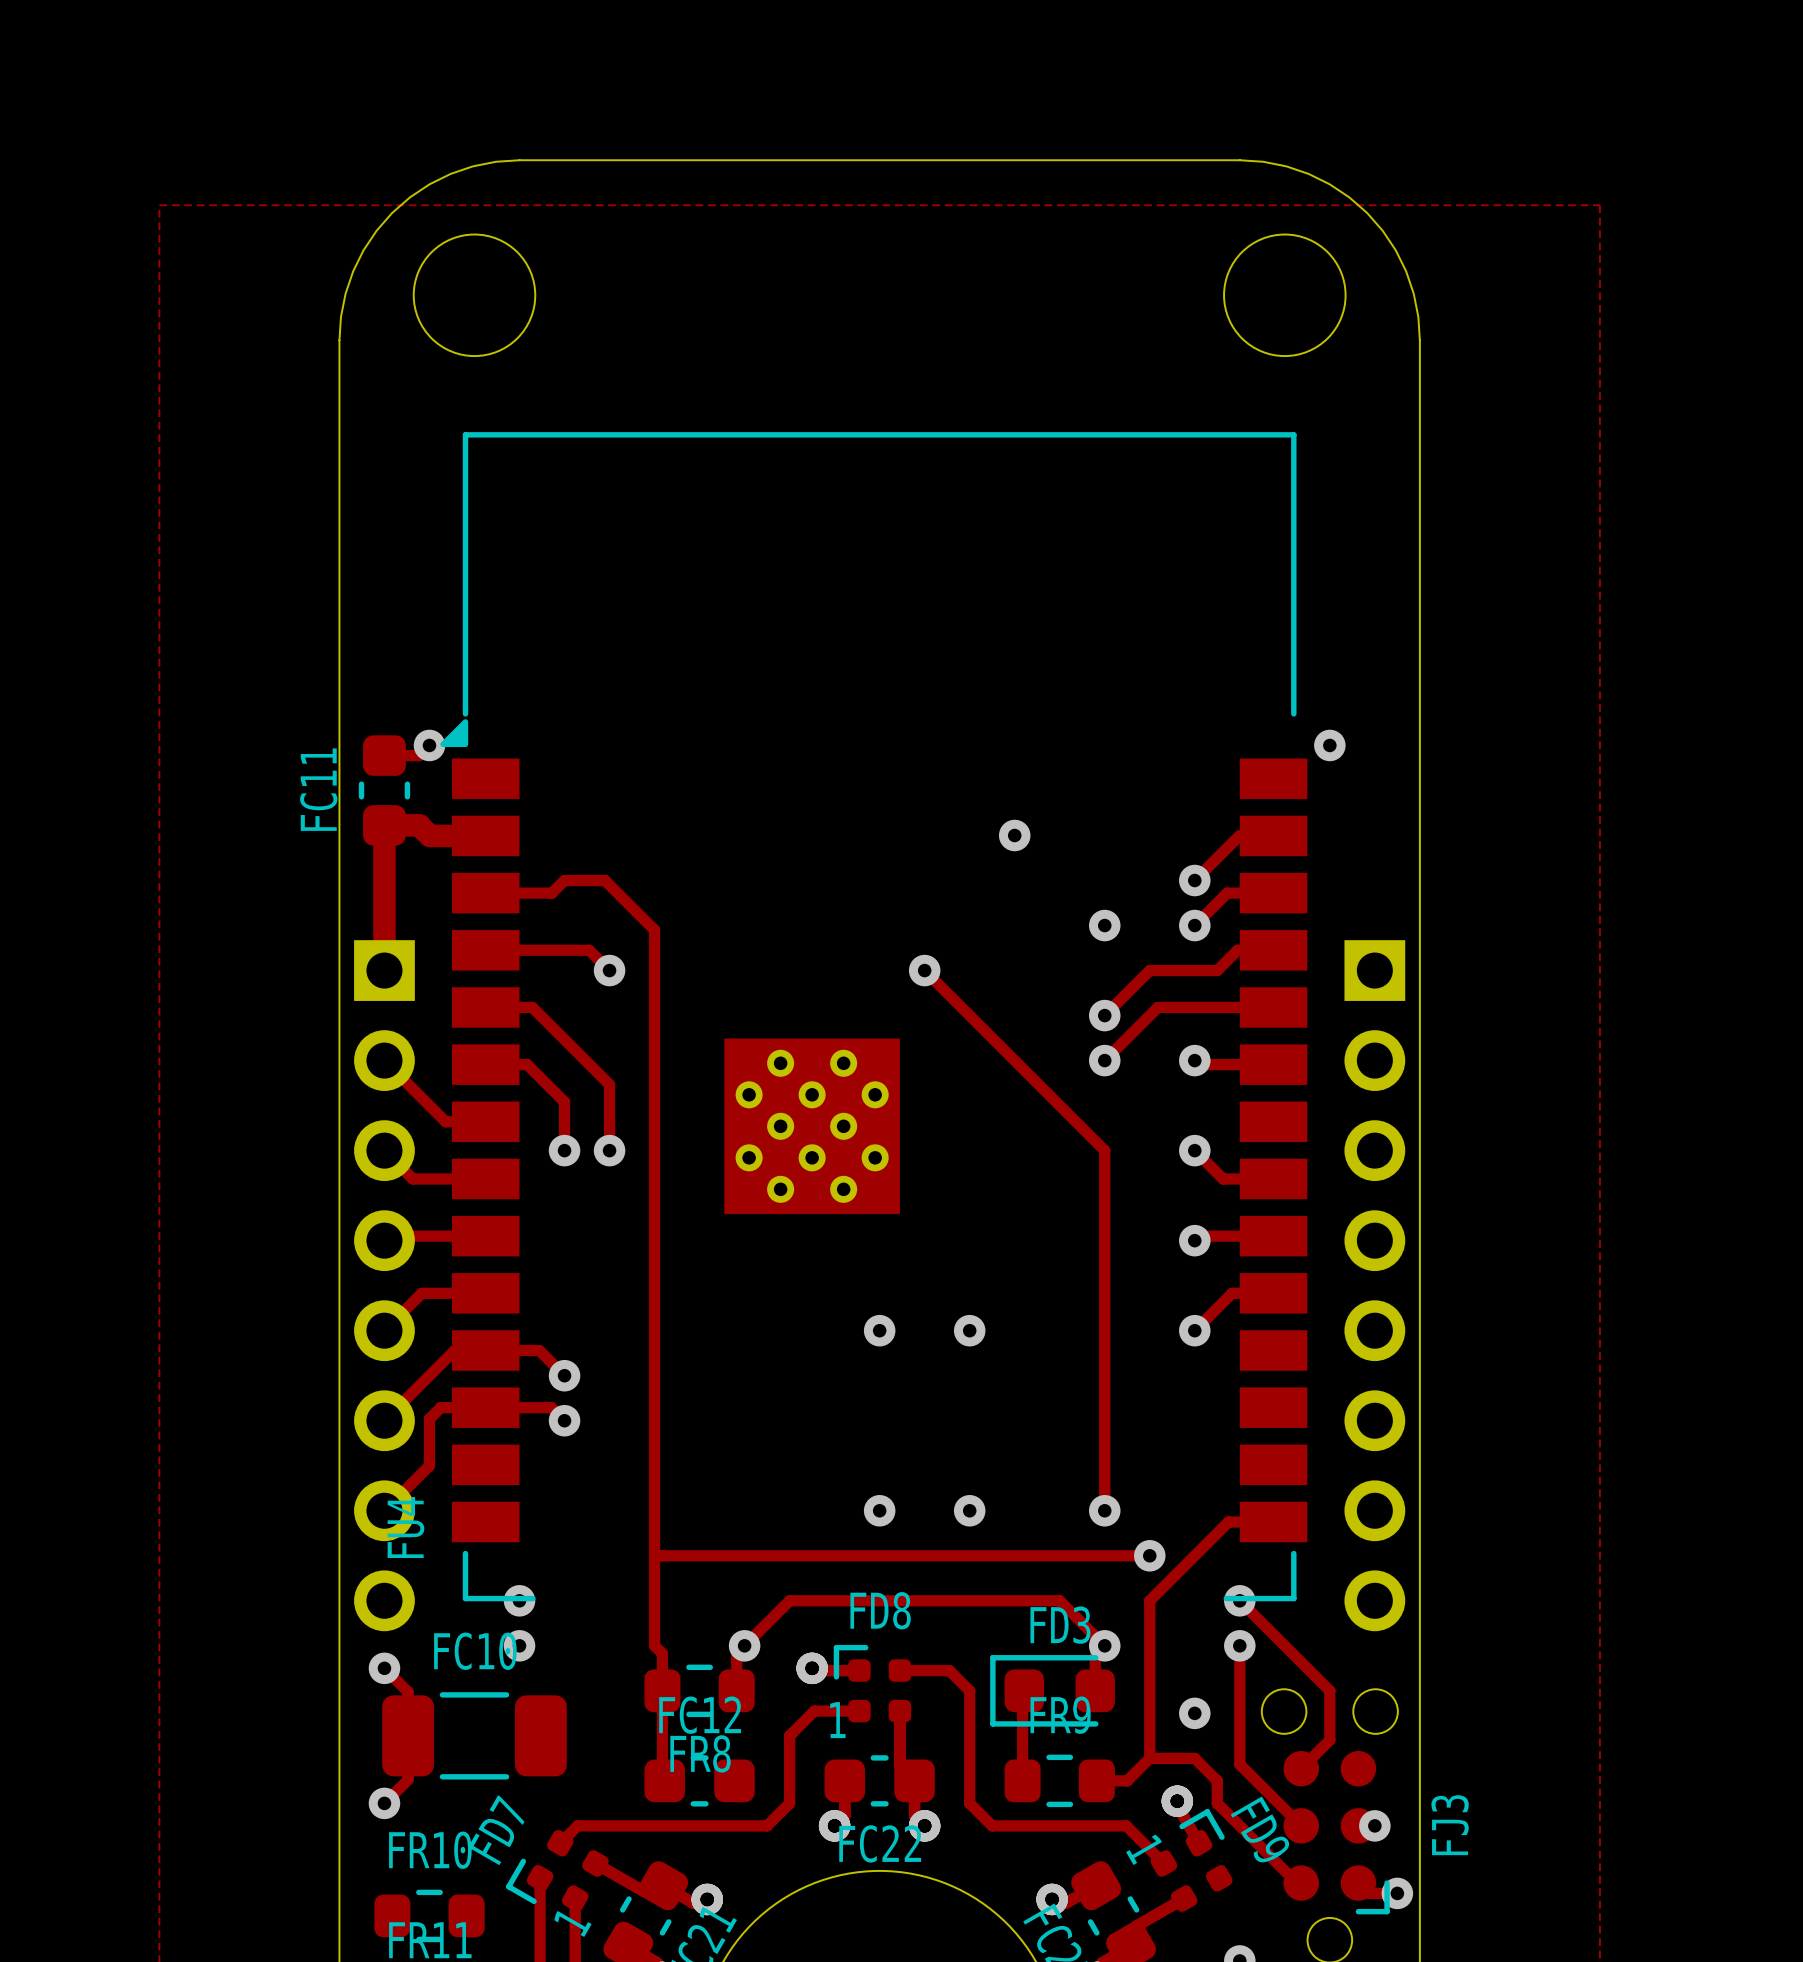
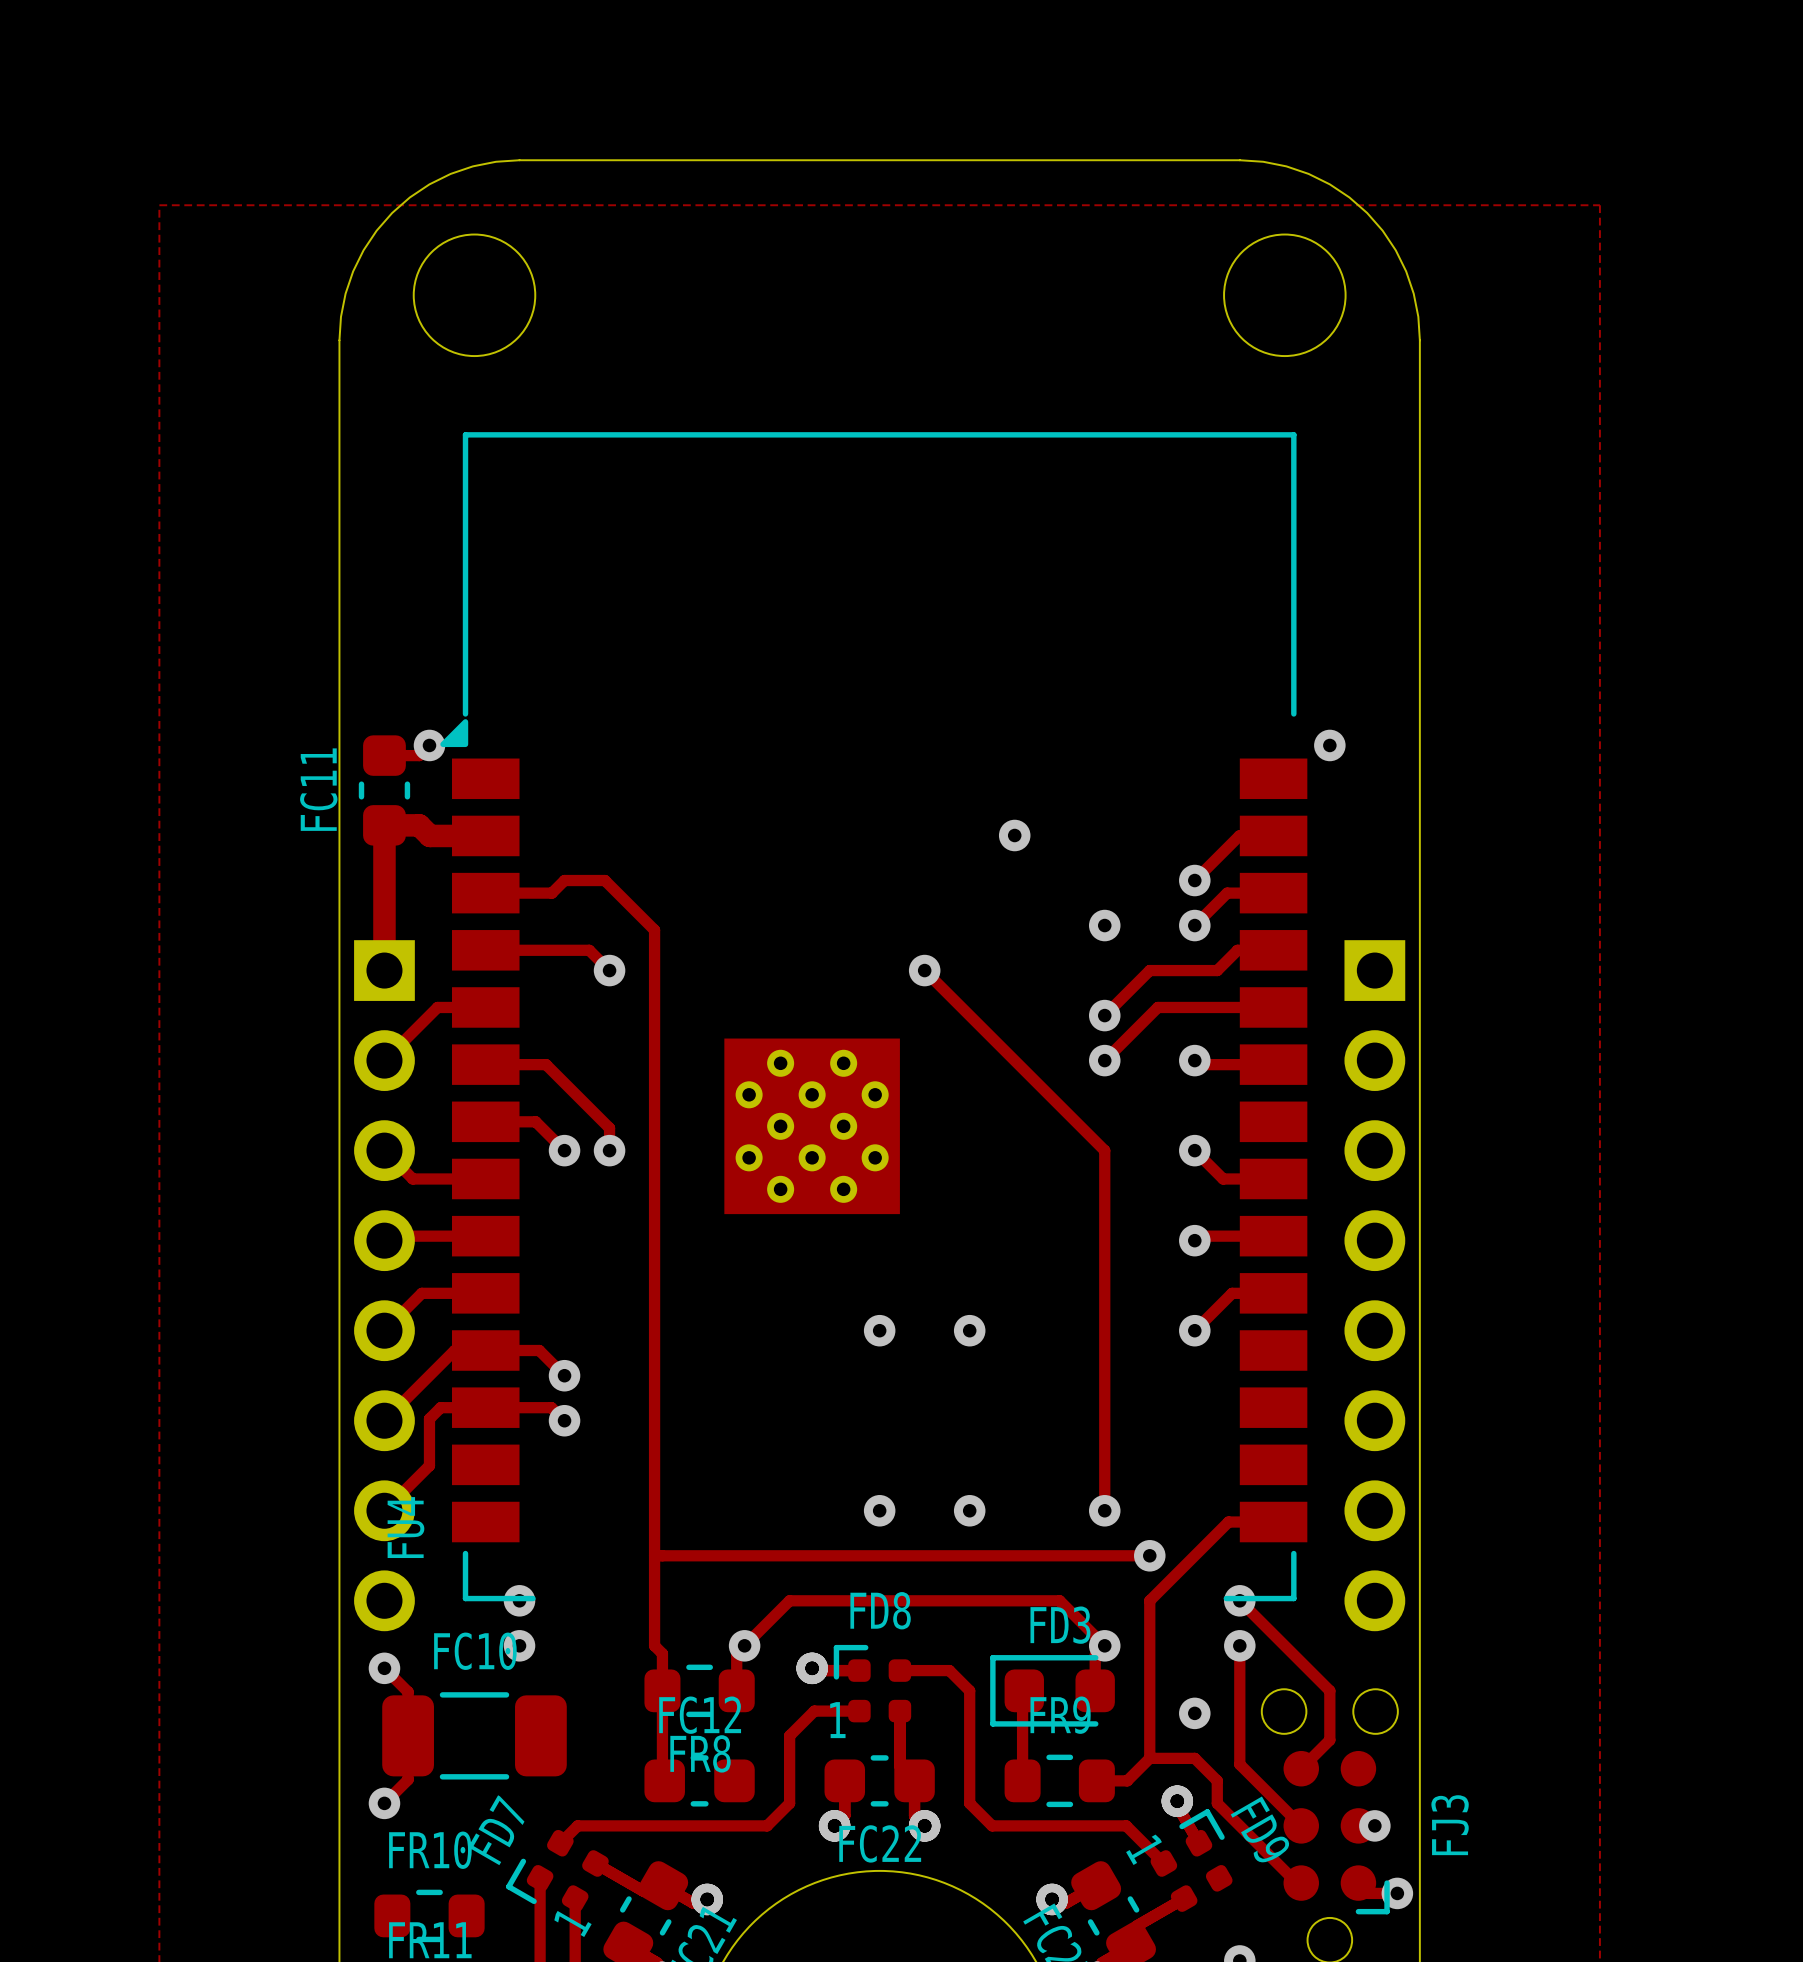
track: (485, 1007) (532, 1007) (609, 1084) (609, 1128) -> none
track: (384, 1060) (445, 1121) (485, 1121) -> (384, 1060) (437, 1007) (485, 1007)
track: (527, 1064) (564, 1102) (564, 1150) -> (527, 1064) (546, 1064) (609, 1128)
track: none -> (485, 1121) (535, 1121) (564, 1150)

